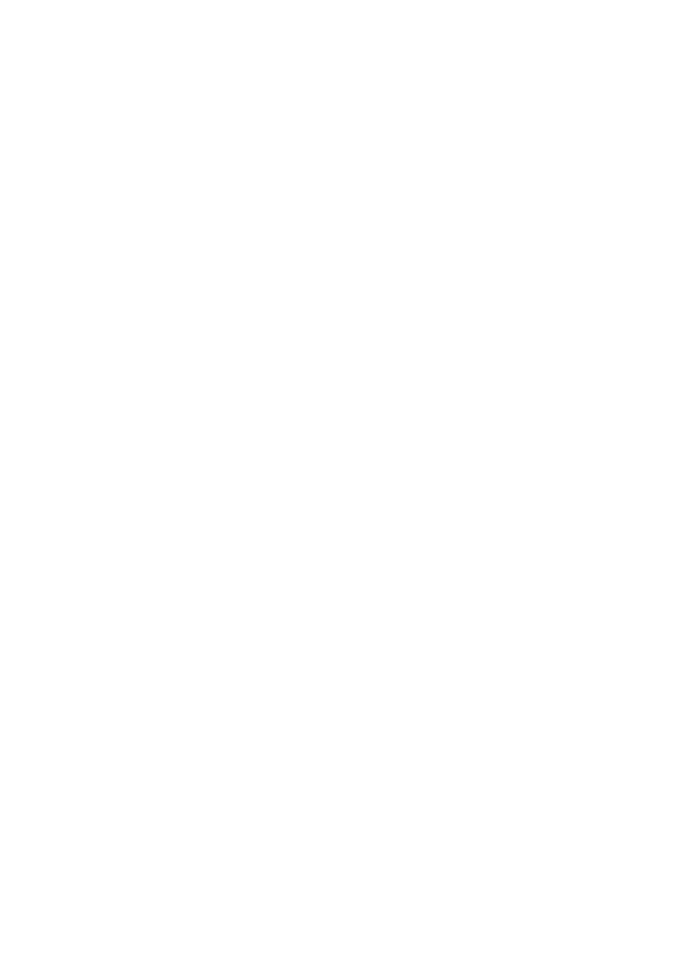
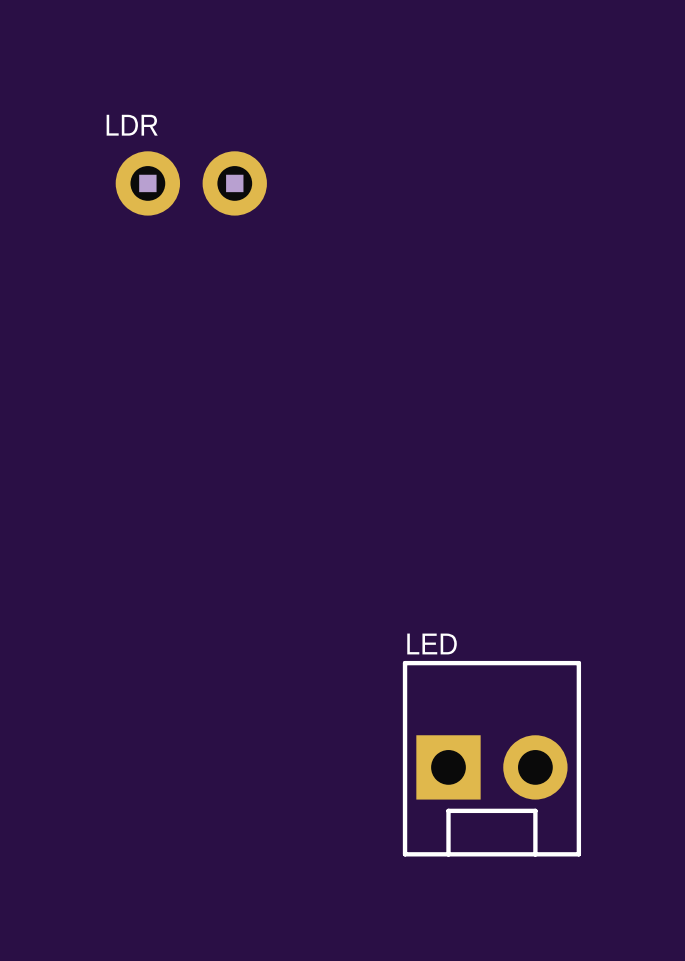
LDR: none -> (191, 183)
LED: none -> (491, 758)

